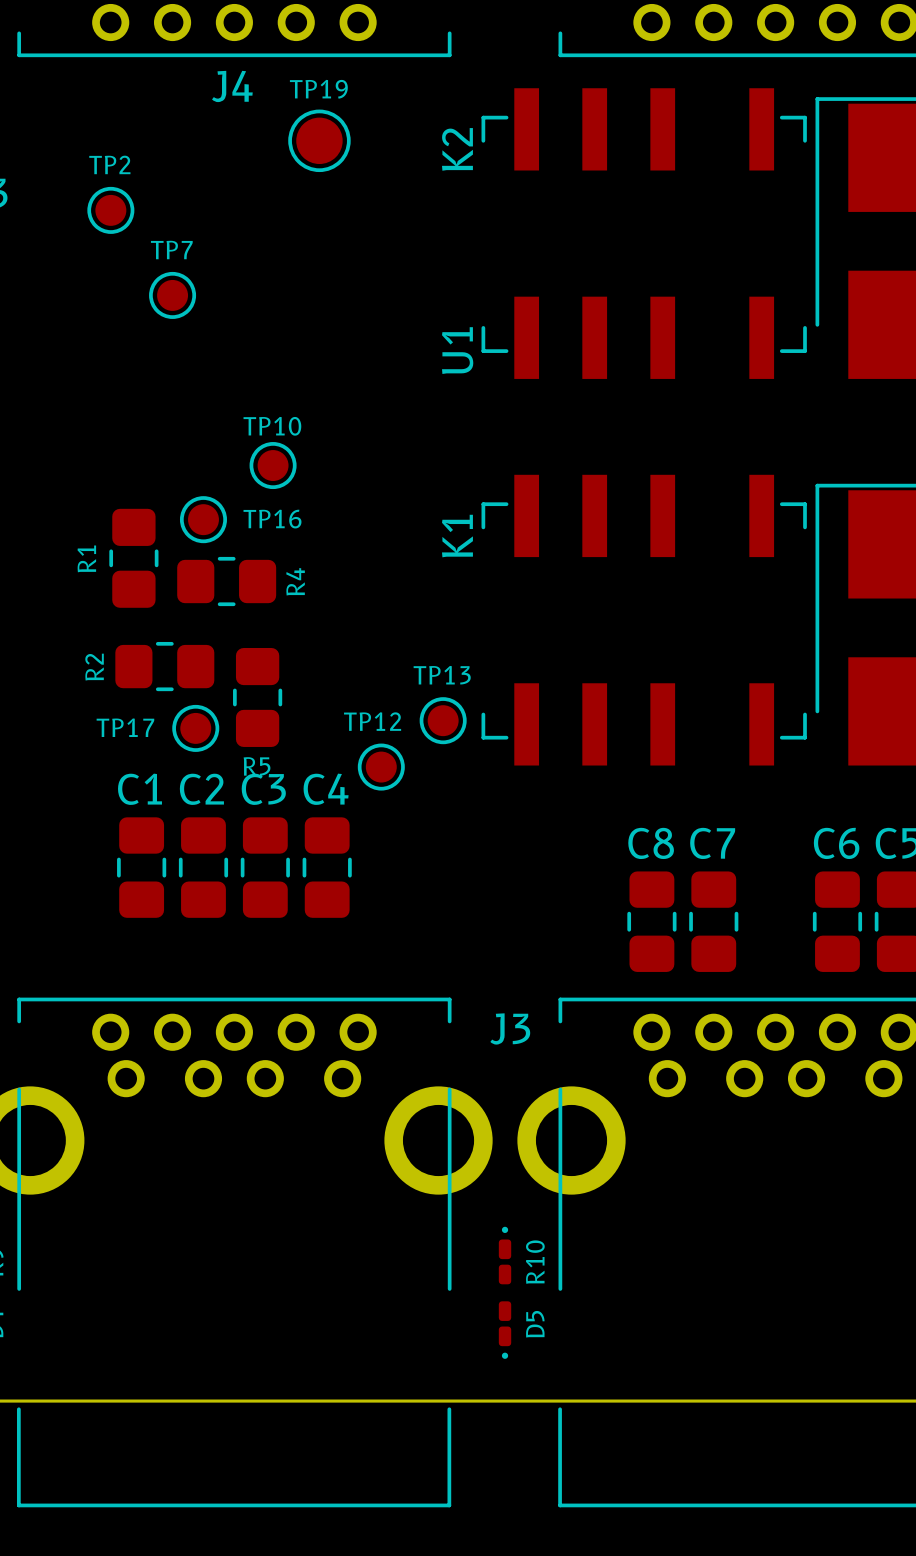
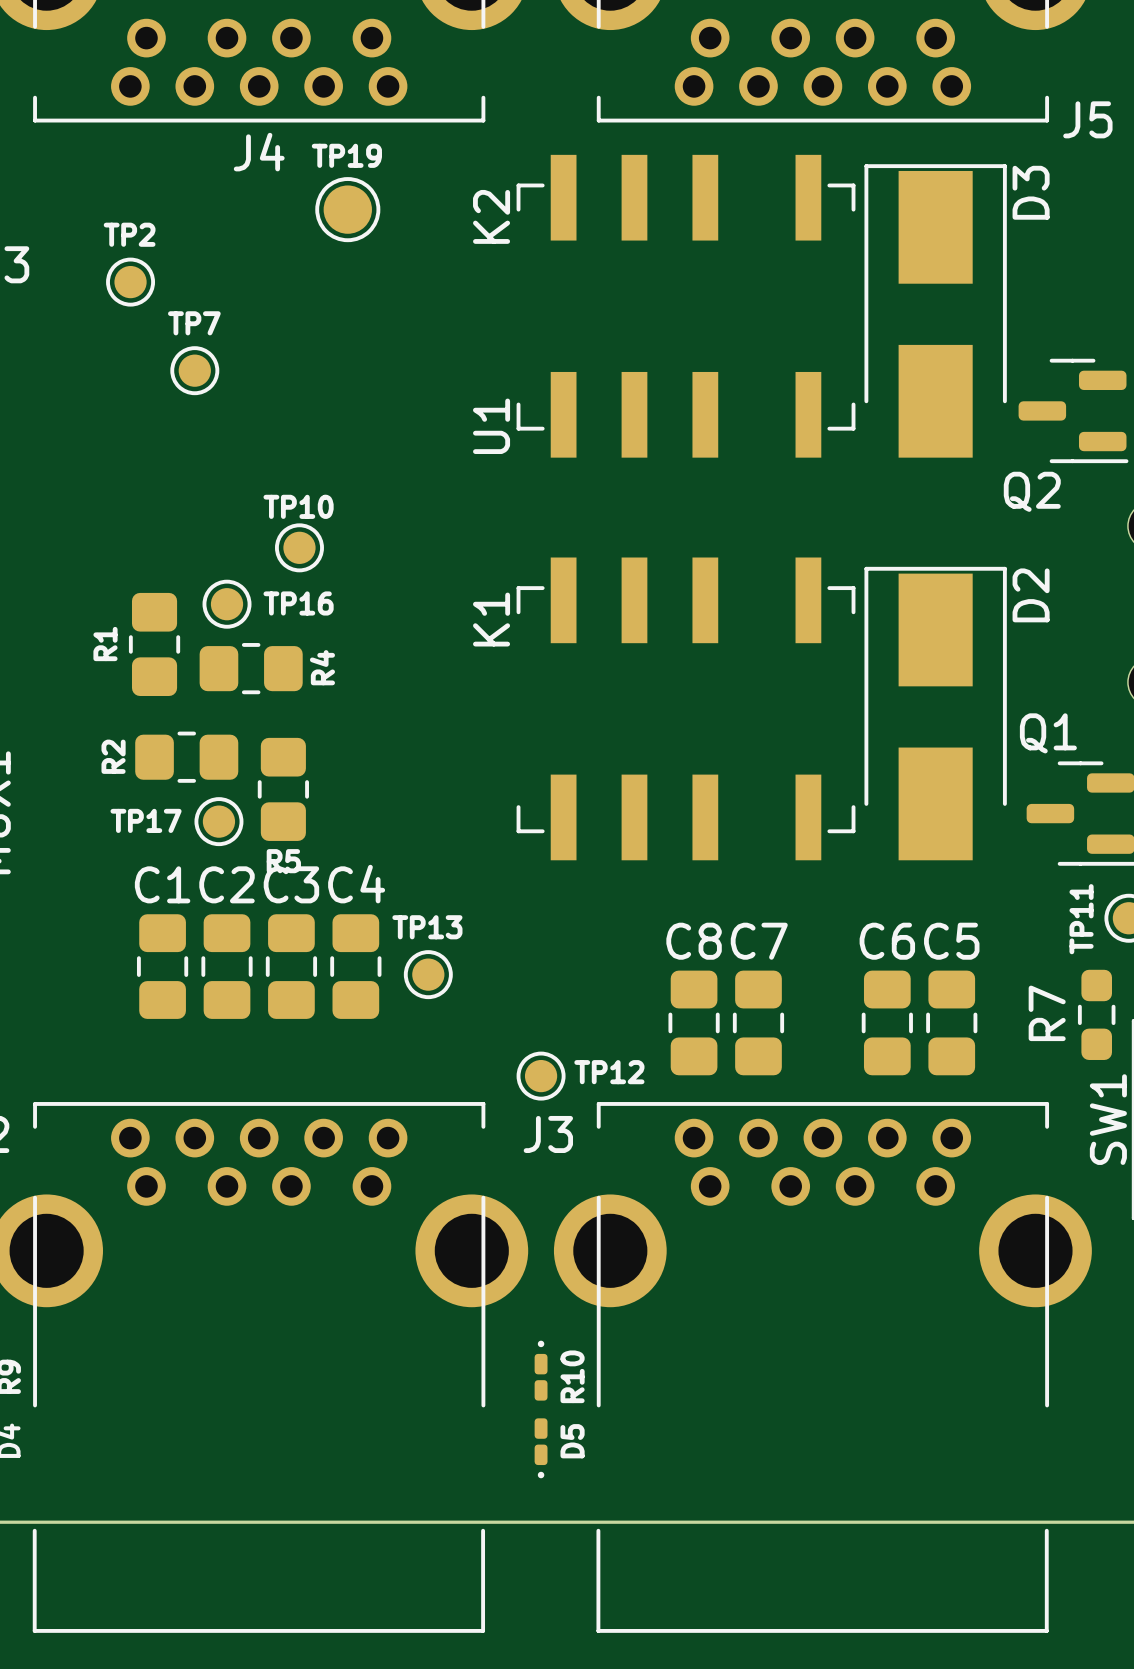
TP13 position: (443, 720) -> (428, 974)
TP12 name position: TP12 (372, 721) -> TP12 (609, 1072)
TP12 position: (381, 767) -> (541, 1076)

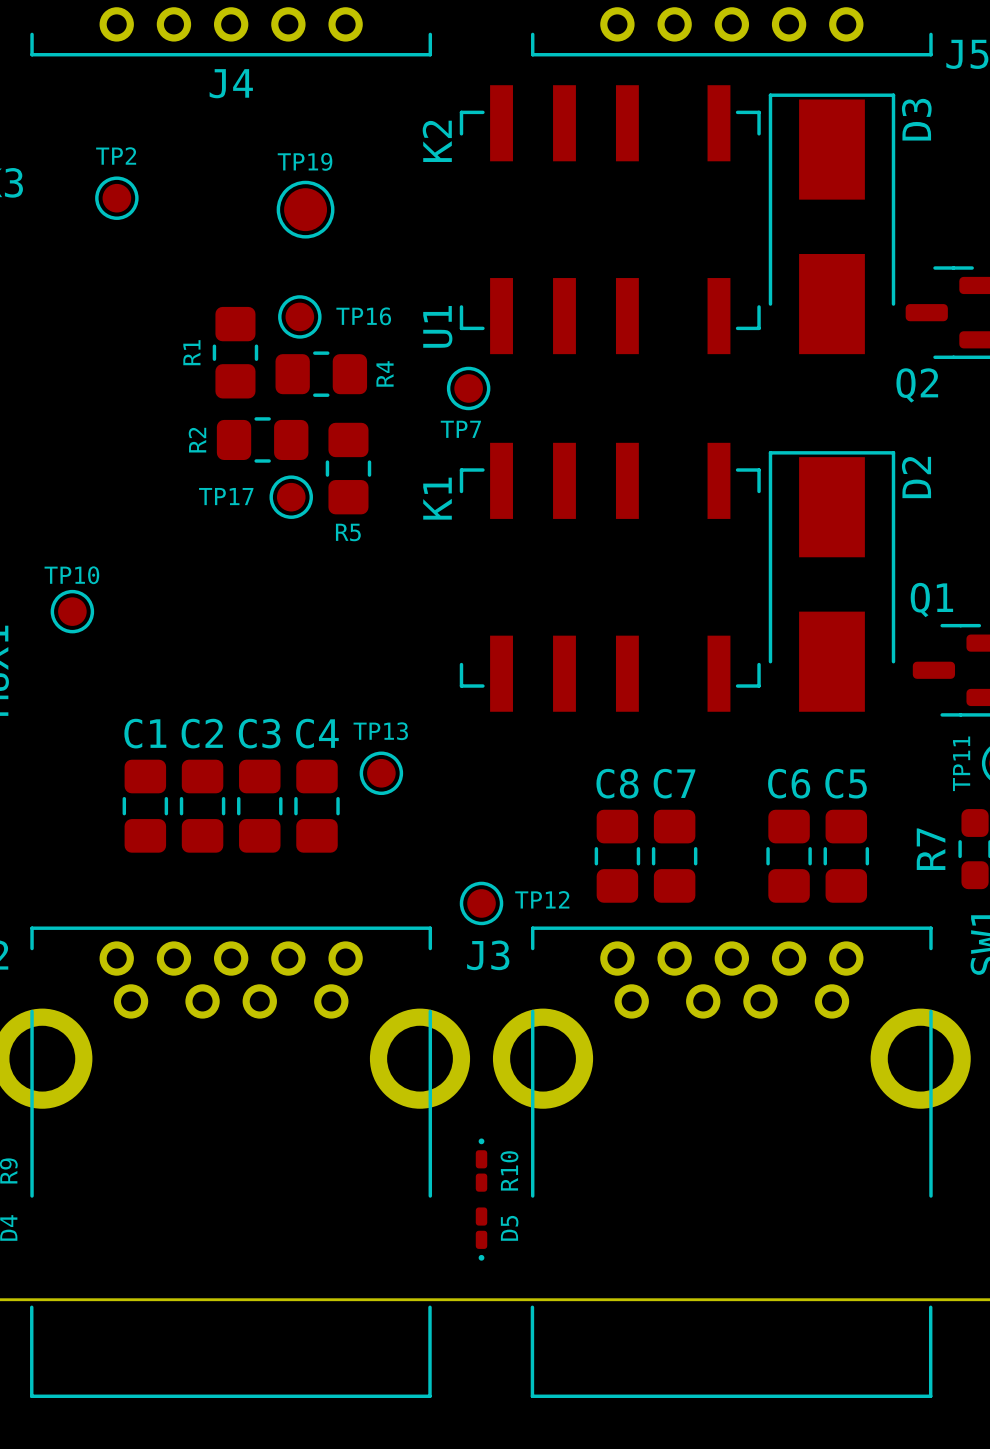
TP19 position: (347, 209) -> (305, 209)
TP7 name position: TP7 (194, 323) -> TP7 (460, 429)
TP7 position: (194, 370) -> (468, 388)
TP10 position: (299, 547) -> (72, 611)
TP16 position: (227, 604) -> (299, 316)
R1 position: (154, 644) -> (235, 352)
R4 position: (251, 668) -> (321, 374)
R2 position: (186, 757) -> (262, 439)
R5 position: (283, 789) -> (348, 468)
TP17 position: (218, 821) -> (291, 497)
TP13 position: (428, 974) -> (381, 773)

